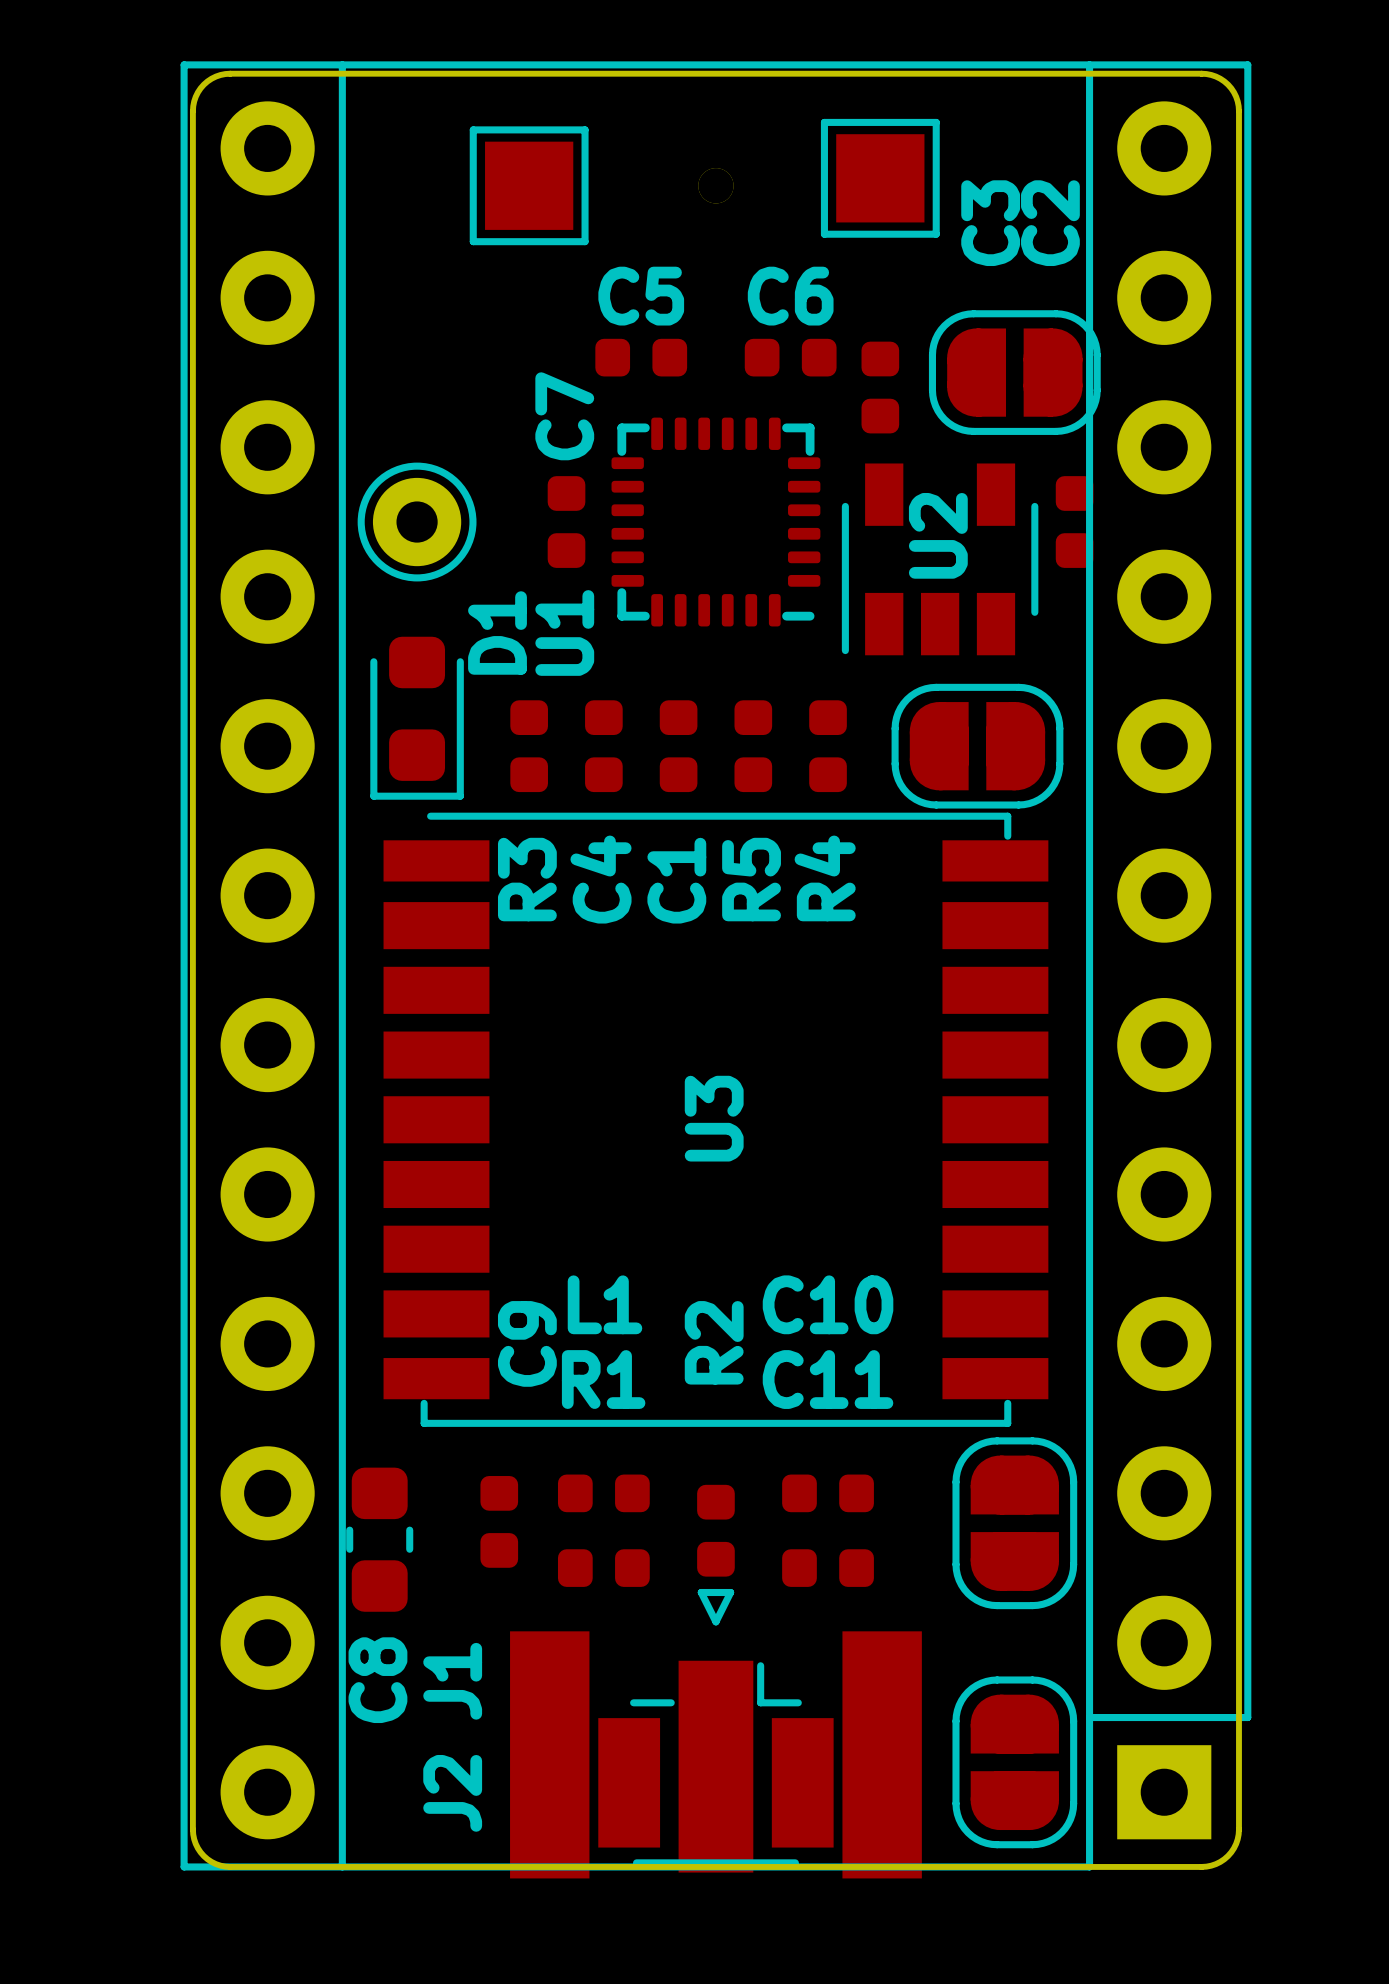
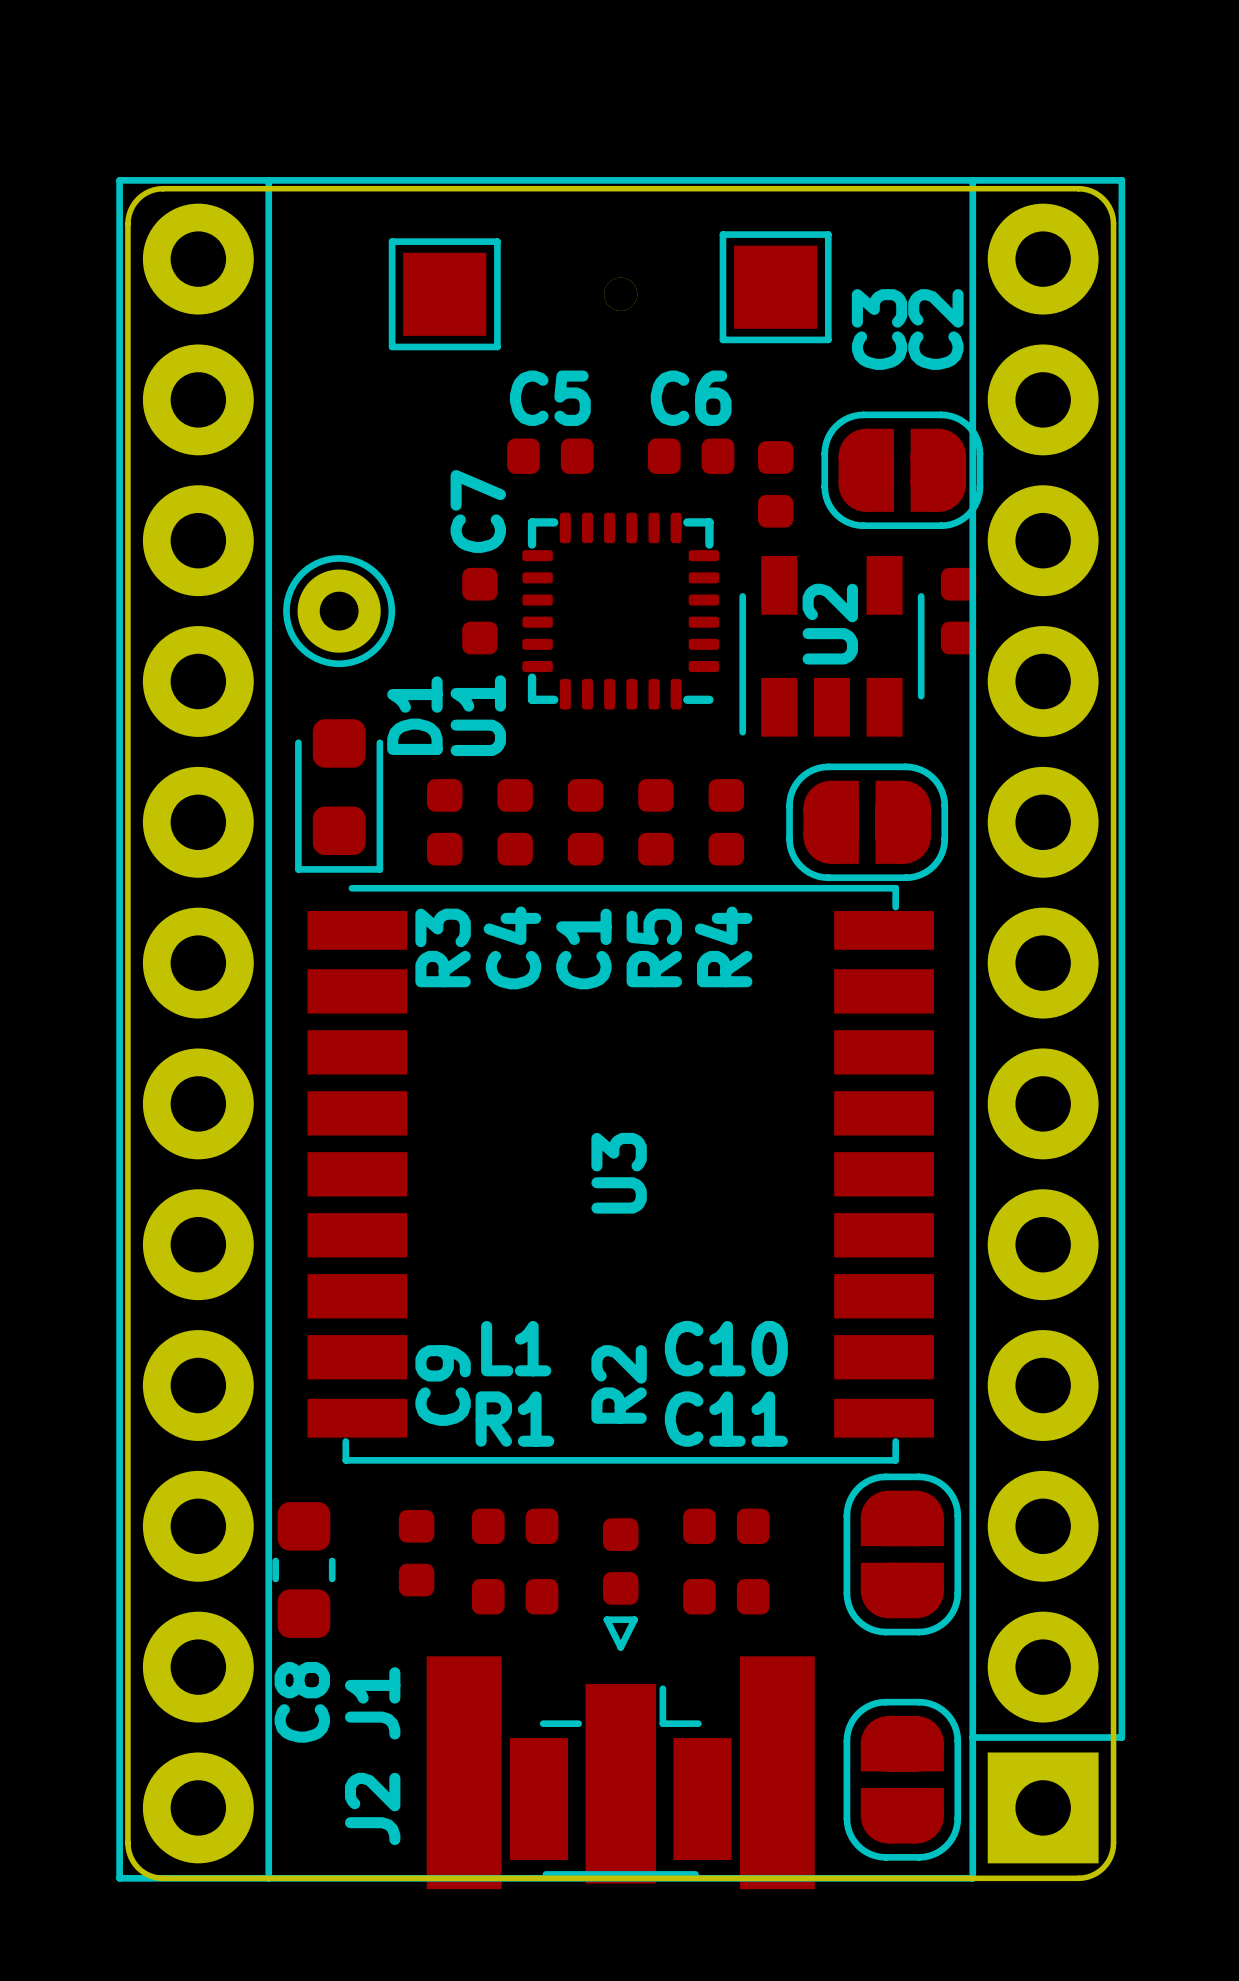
part footprint: [180, 61, 1252, 1871] -> [116, 177, 1126, 1882]

